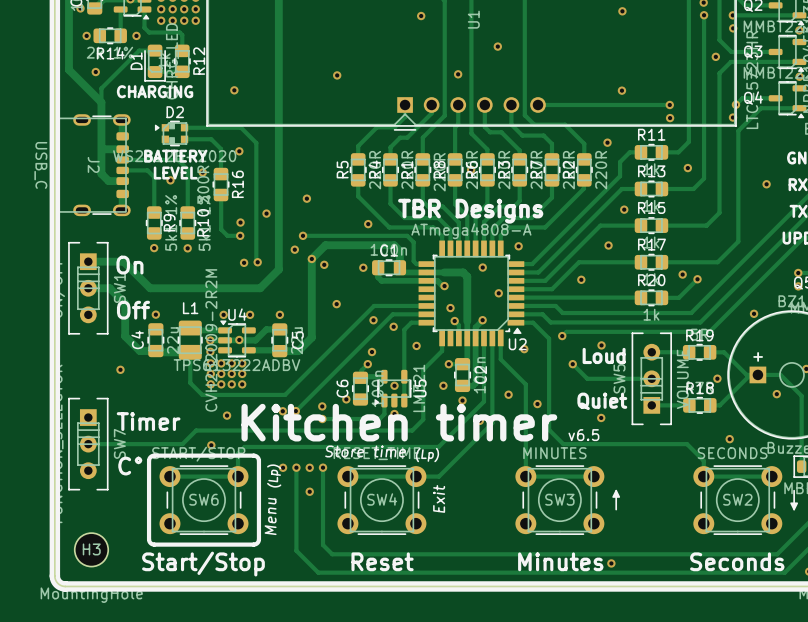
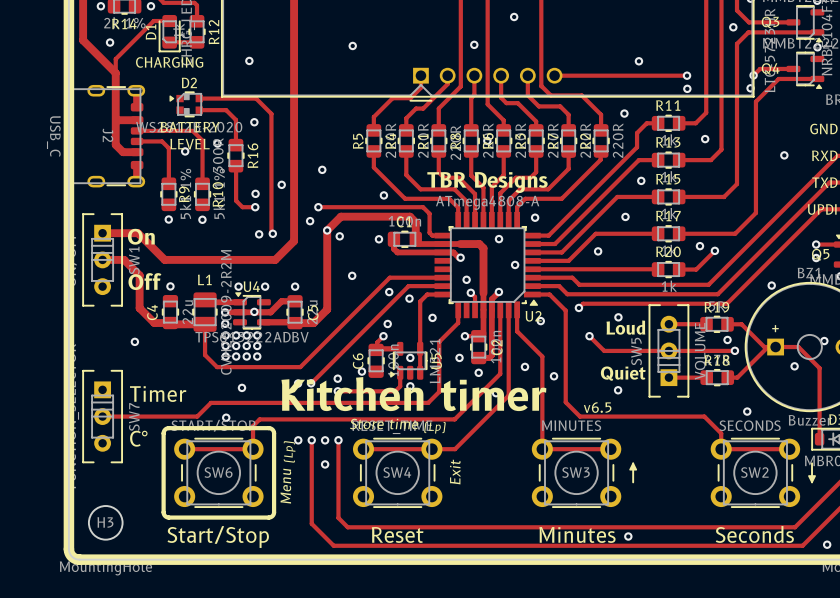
via: none -> (727, 339)
track: none -> (668, 350) (735, 350)

